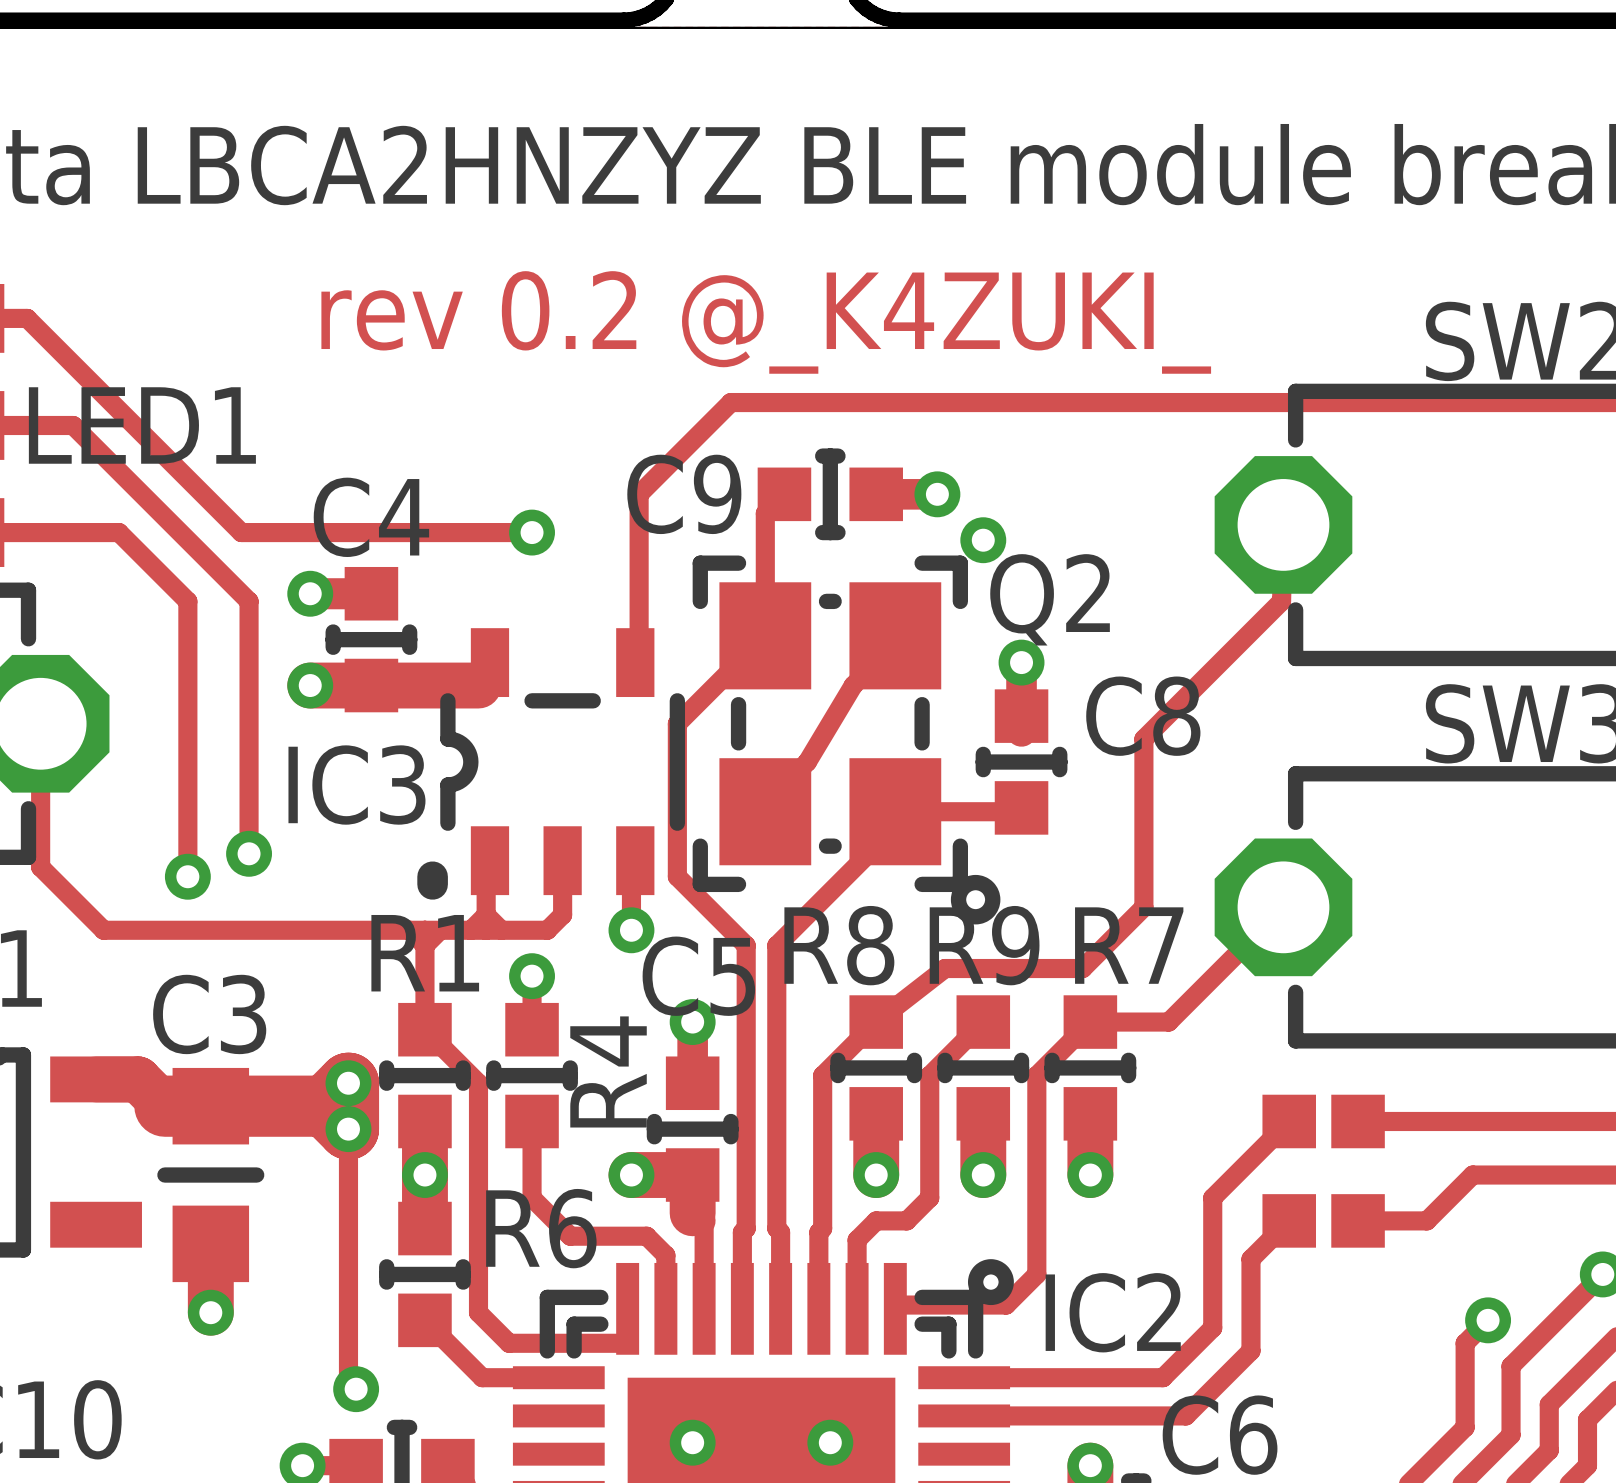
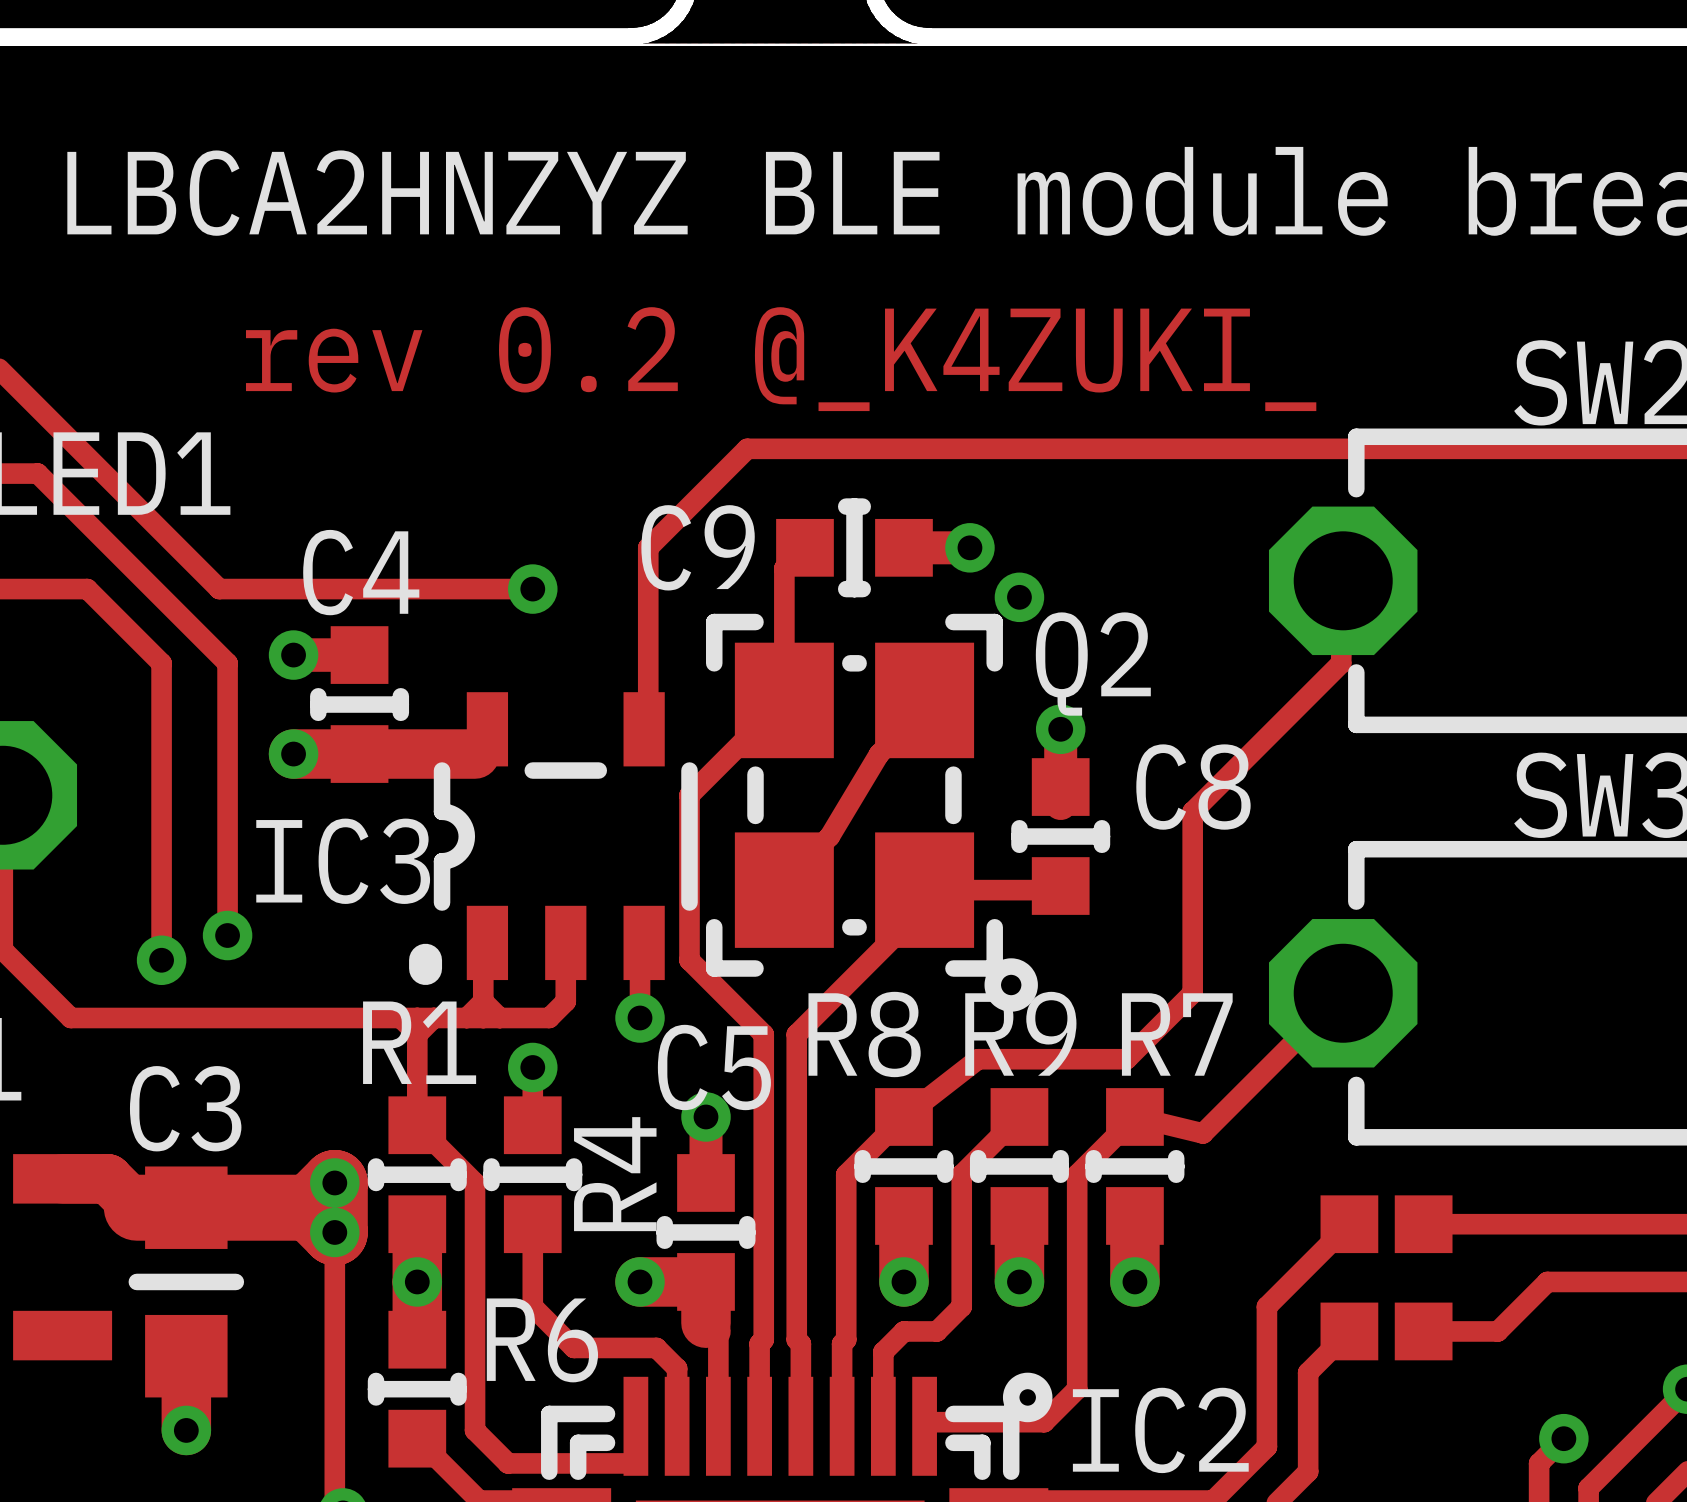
track: (1090, 1022) (1168, 1022) -> (1134, 1116) (1202, 1133) (1219, 1116)

